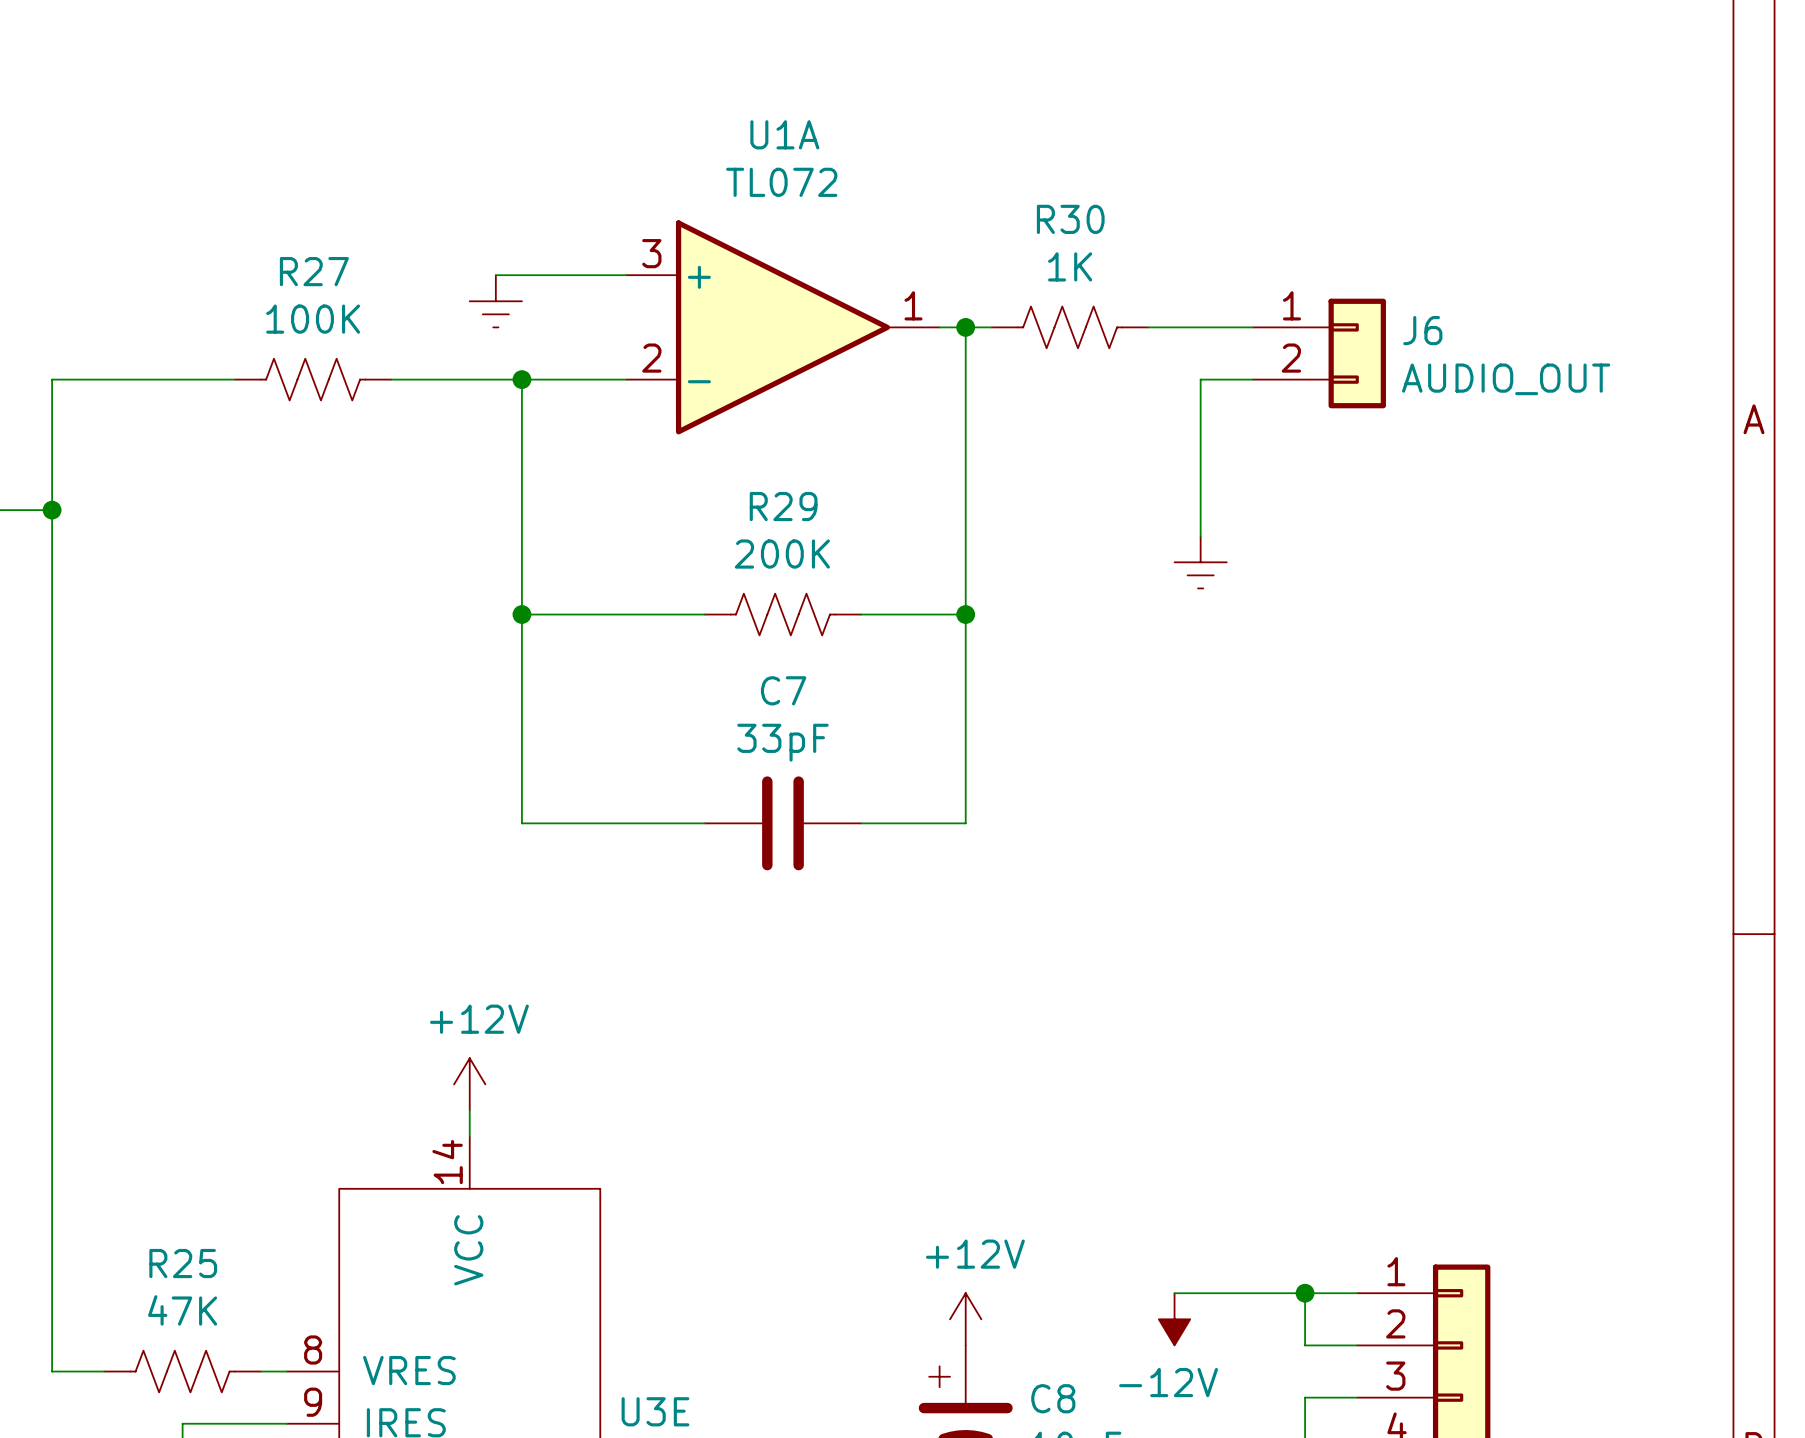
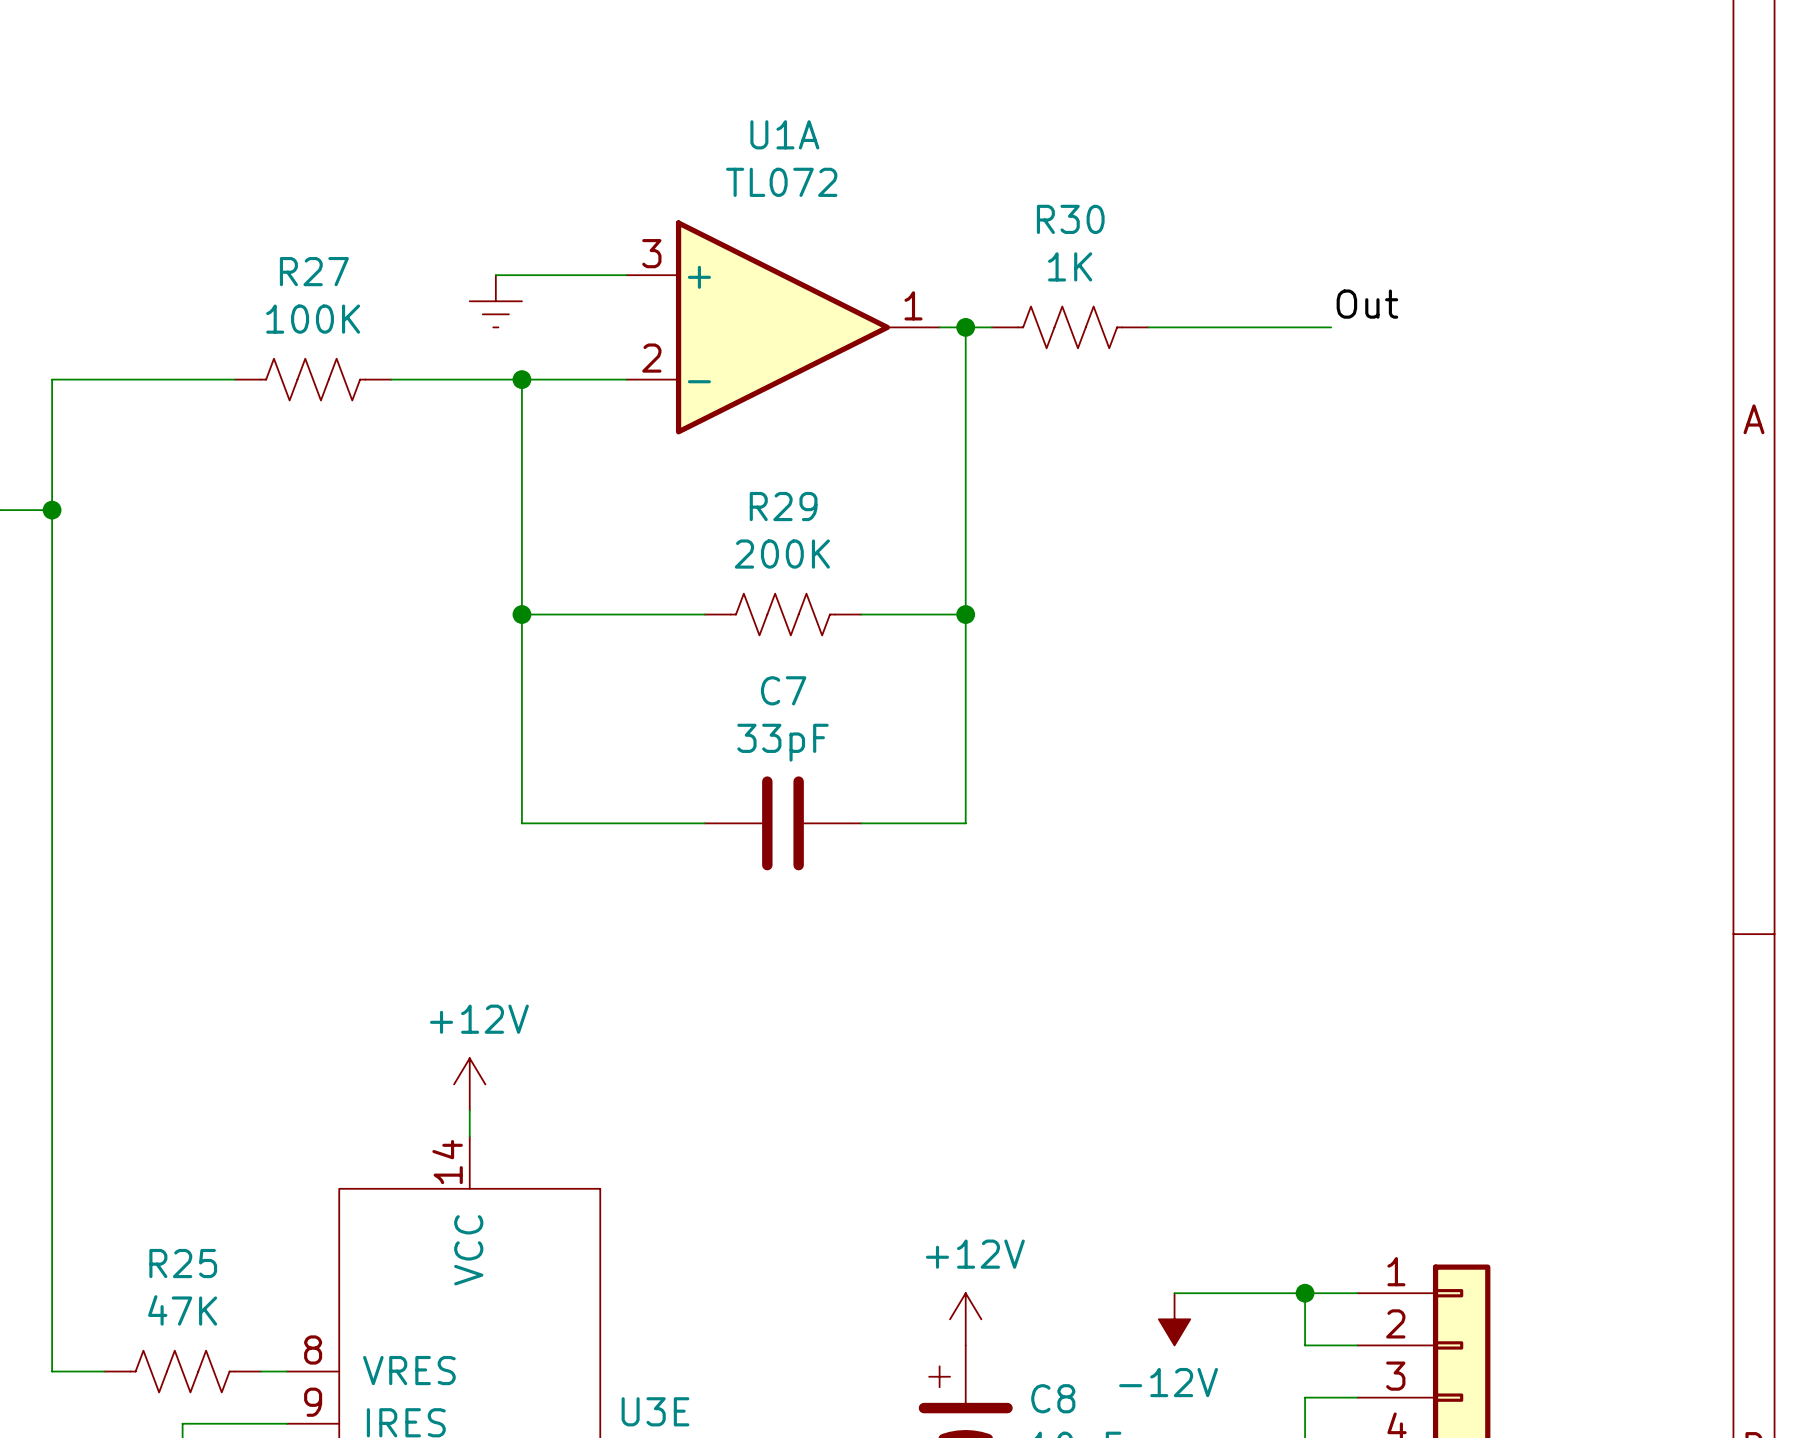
label: none -> Out (1367, 304)
J6: AUDIO_OUT (1319, 353) -> none
wire: (1252, 379) (1200, 379) (1200, 536) -> none
power symbol: (1200, 562) -> none

